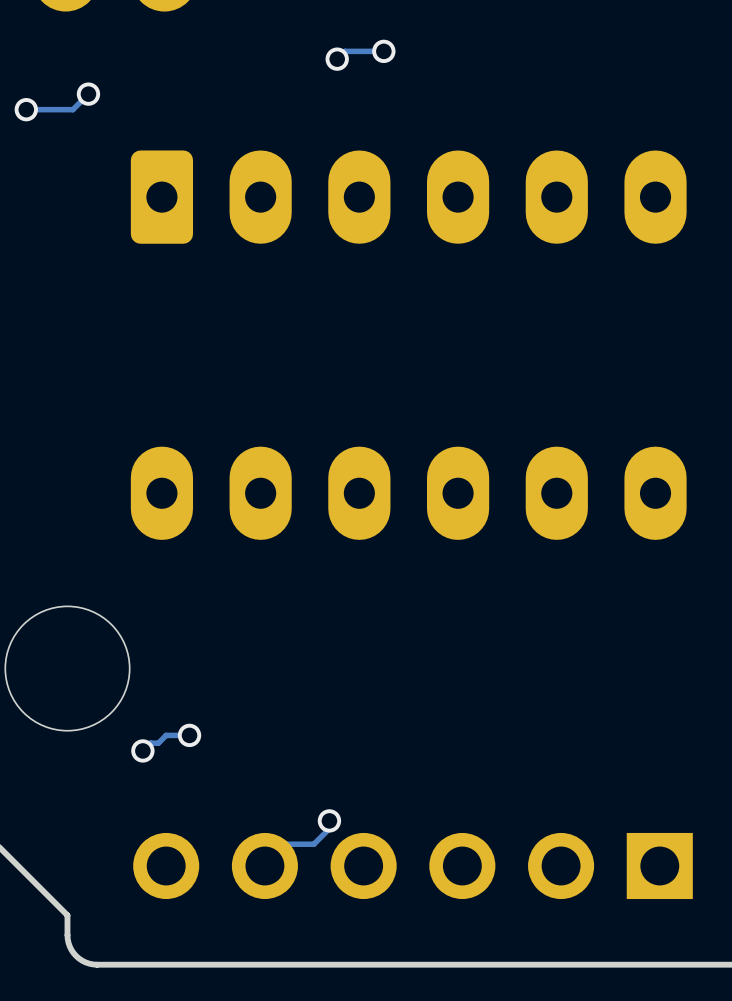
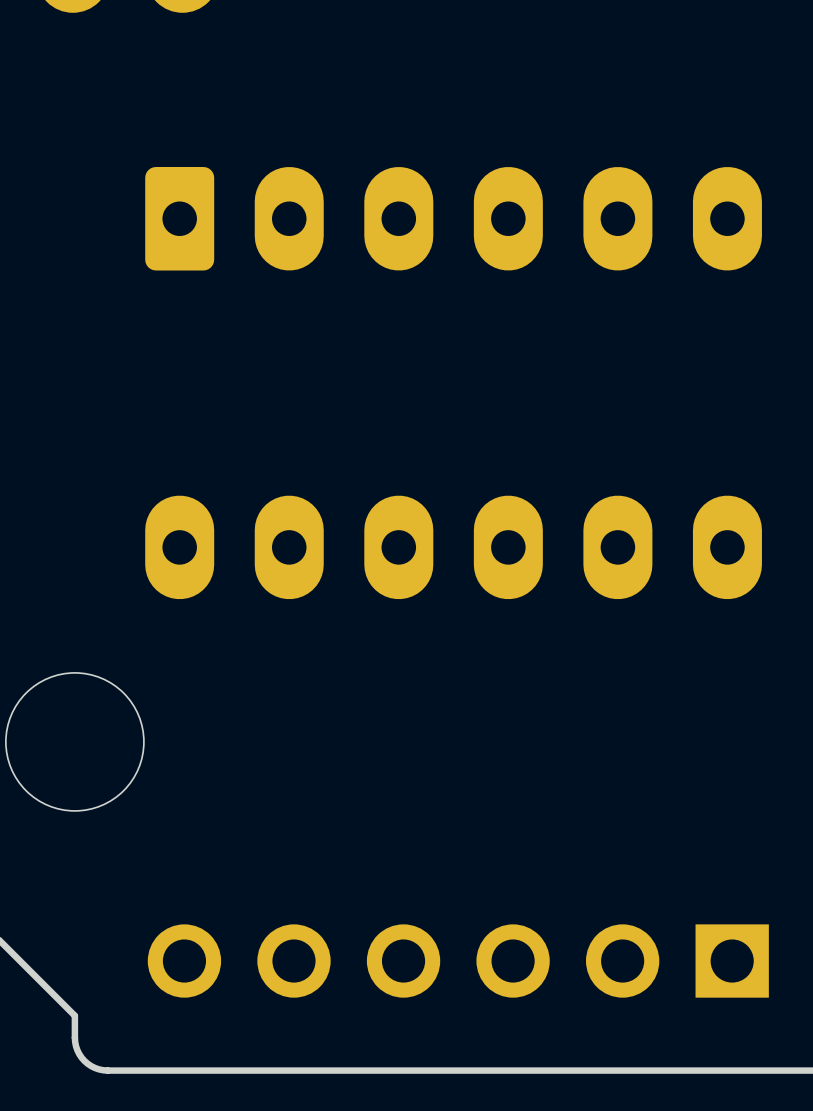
track: (383, 51) (344, 51) (337, 59) -> none
via: (383, 51) -> none
via: (337, 59) -> none
track: (88, 94) (72, 109) (26, 109) -> none
via: (88, 94) -> none
via: (26, 109) -> none
track: (189, 735) (166, 735) (158, 743) (150, 743) (142, 750) -> none
via: (189, 735) -> none
via: (142, 750) -> none
via: (329, 820) -> none
track: (333, 824) (313, 844) (286, 844) (263, 867) -> none

